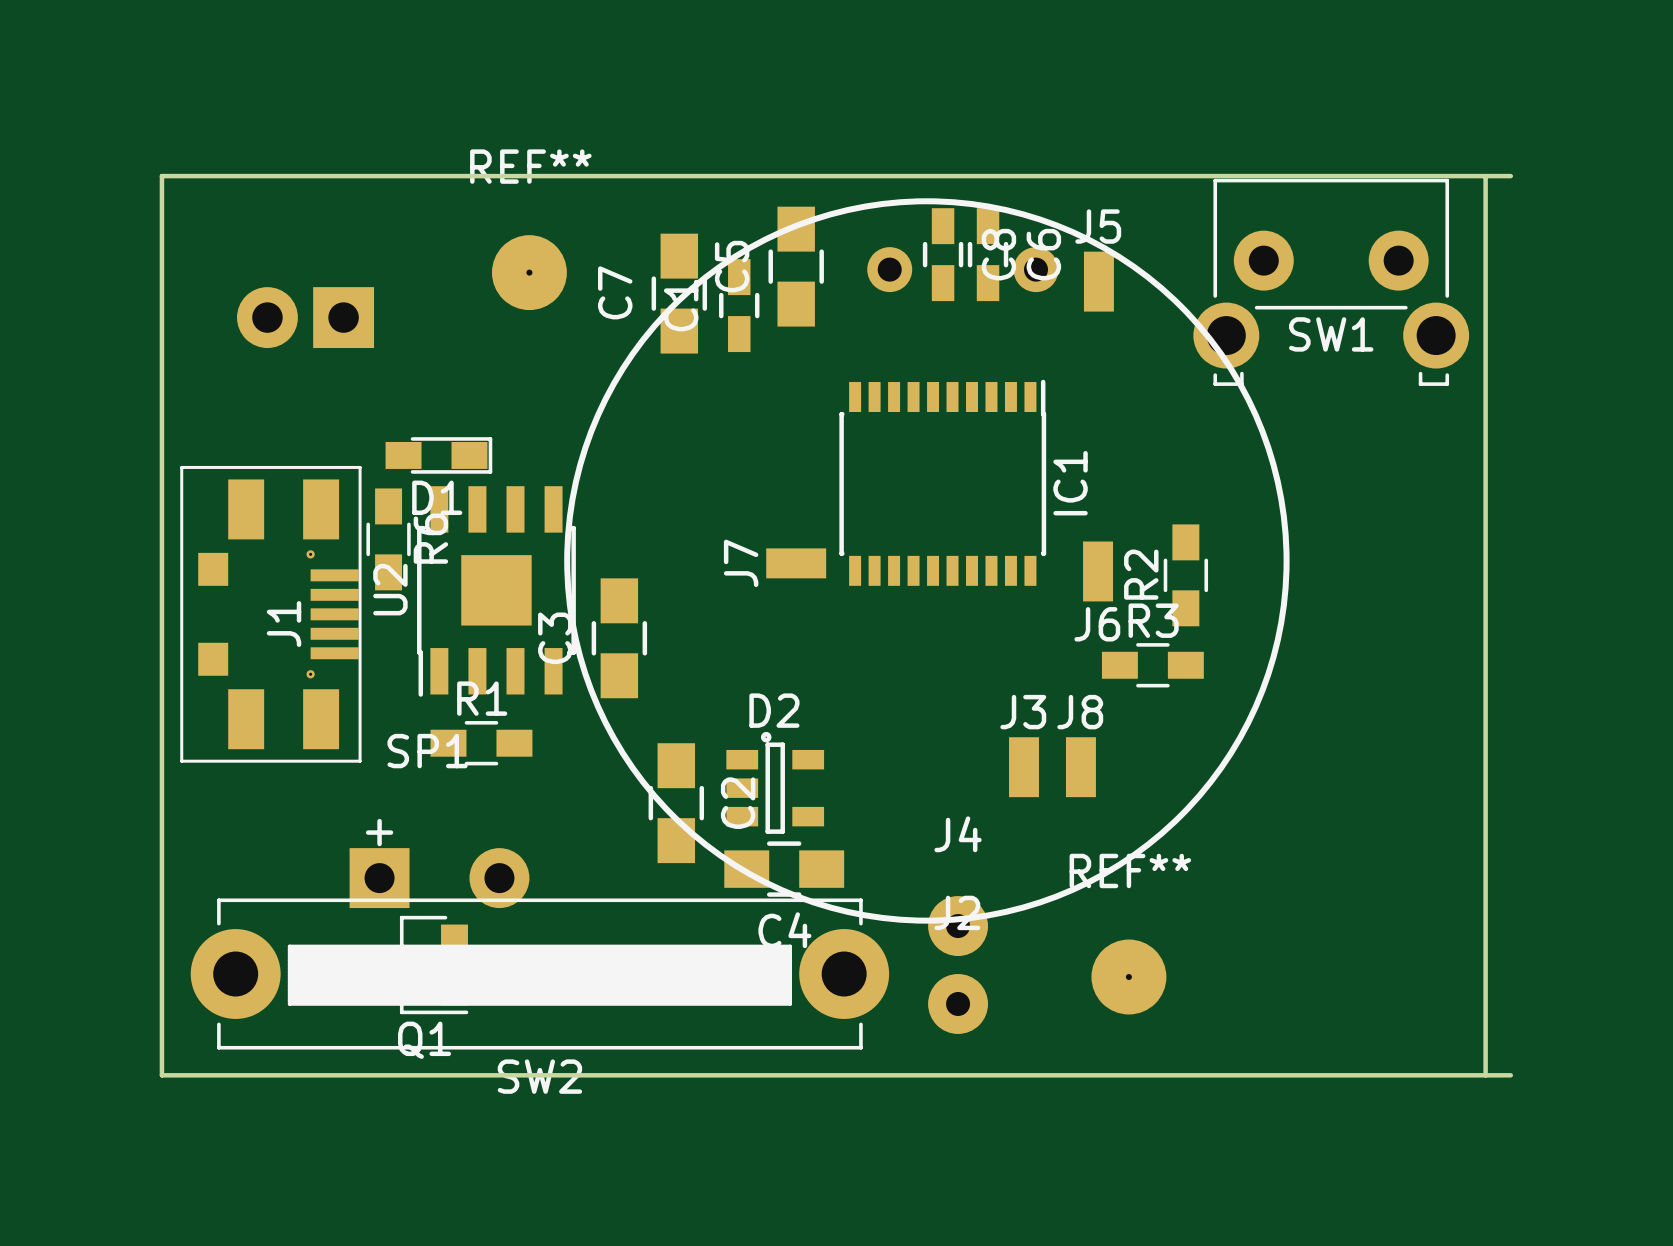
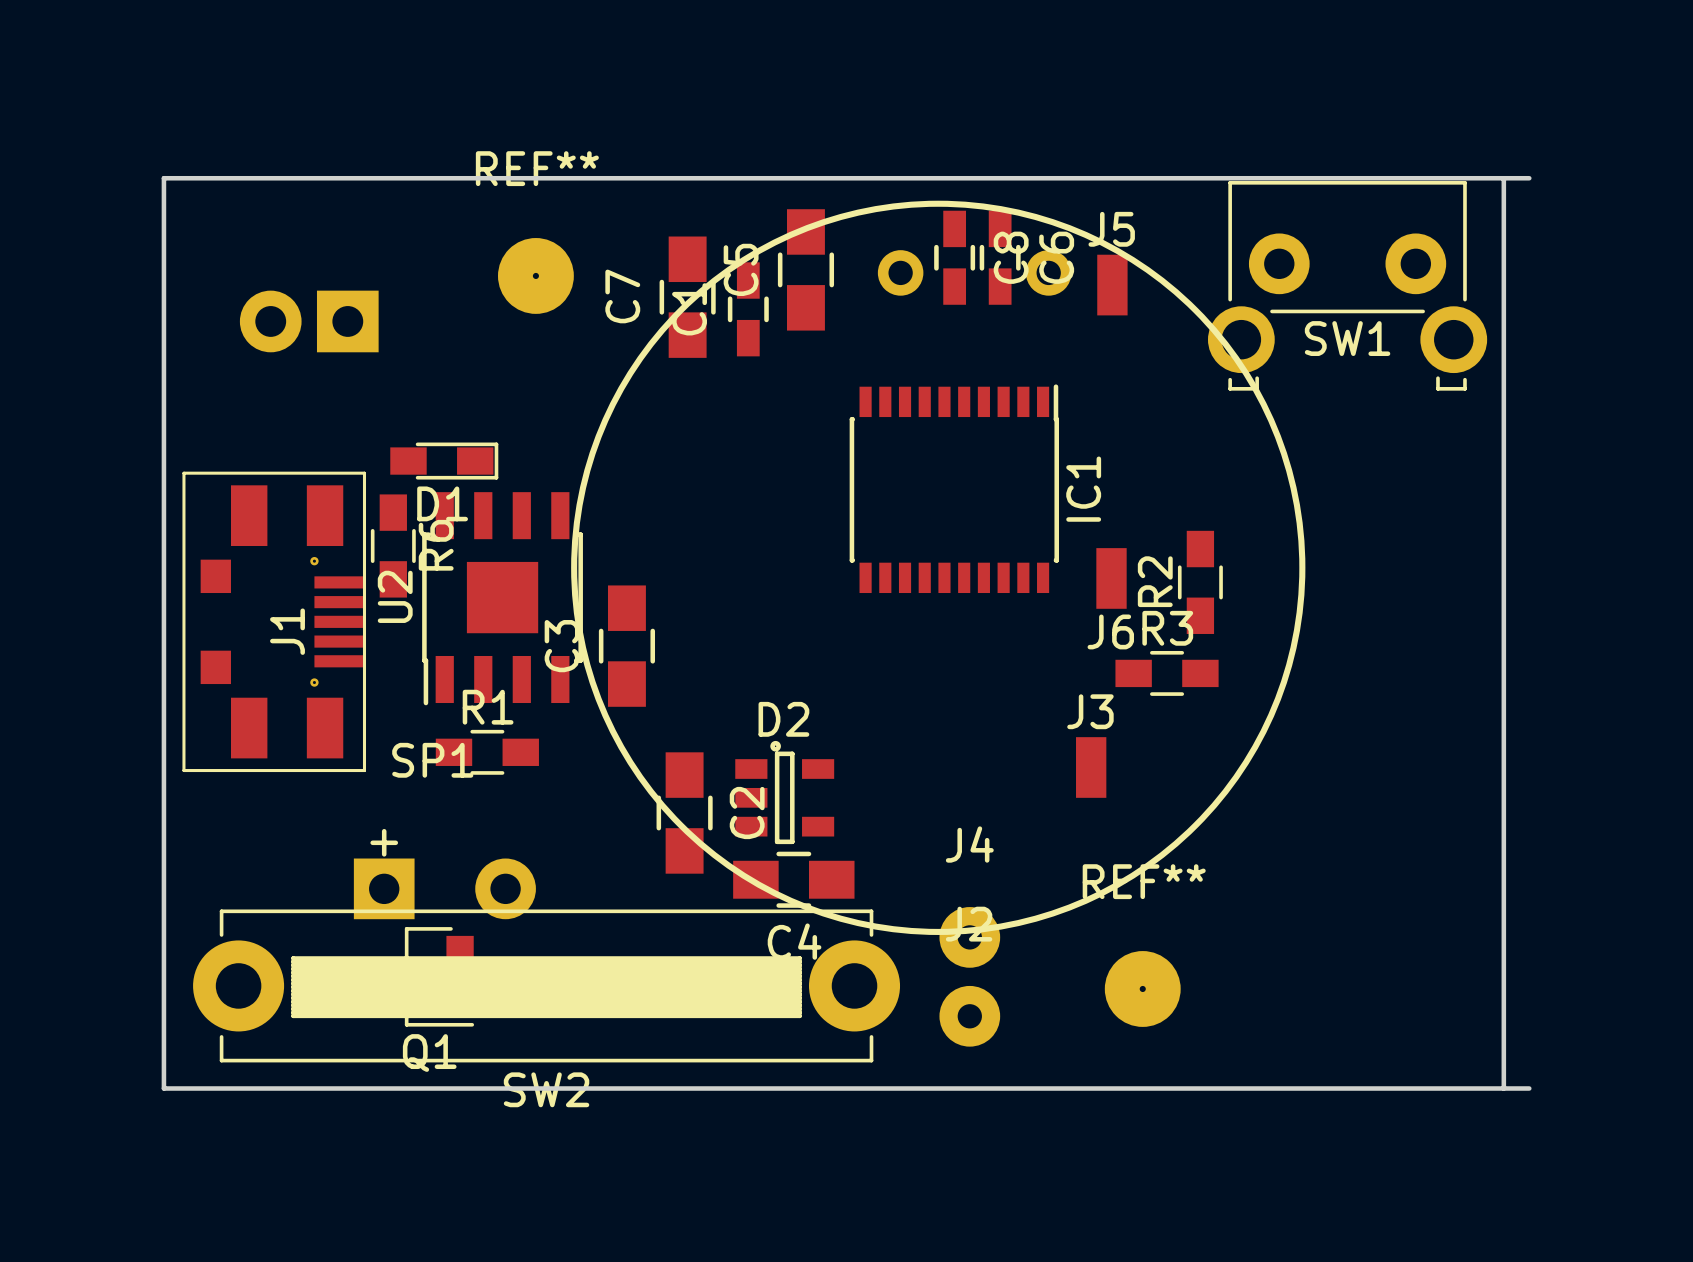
J7: (796, 563) -> none
J3 position: (1024, 767) -> (1091, 767)
J8: (1080, 767) -> none

